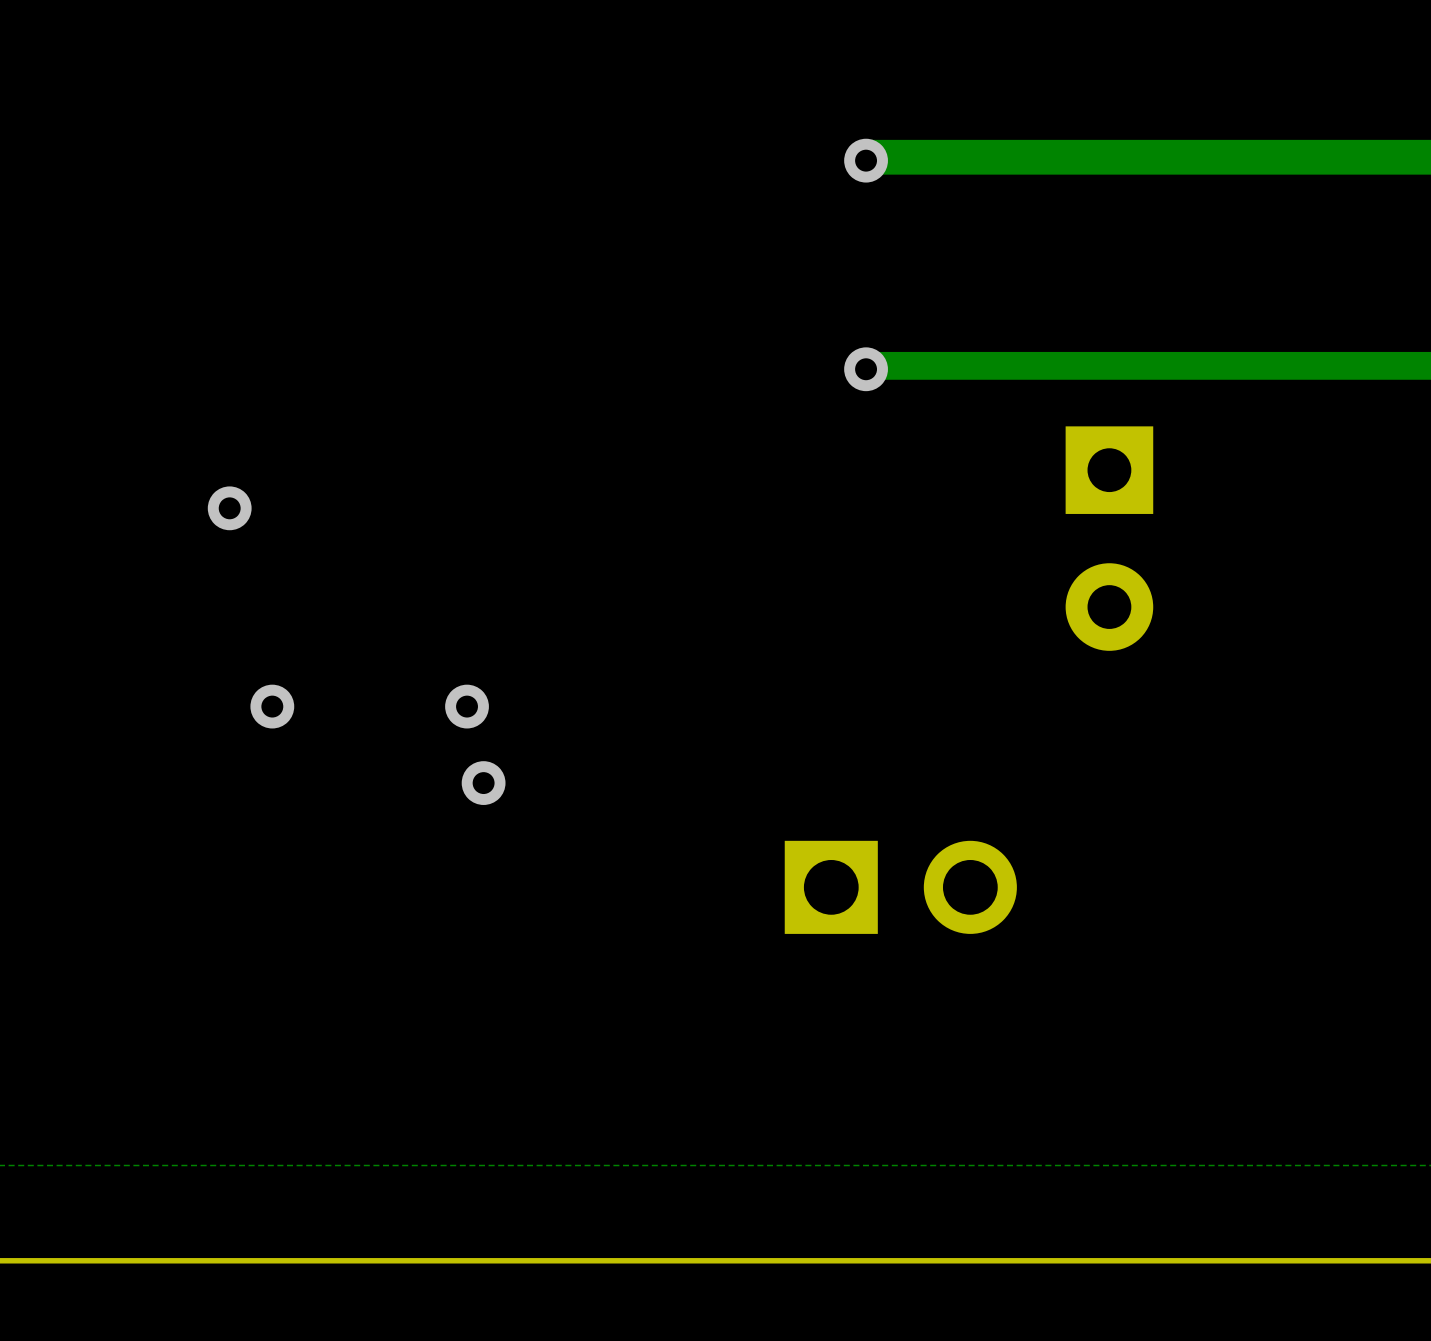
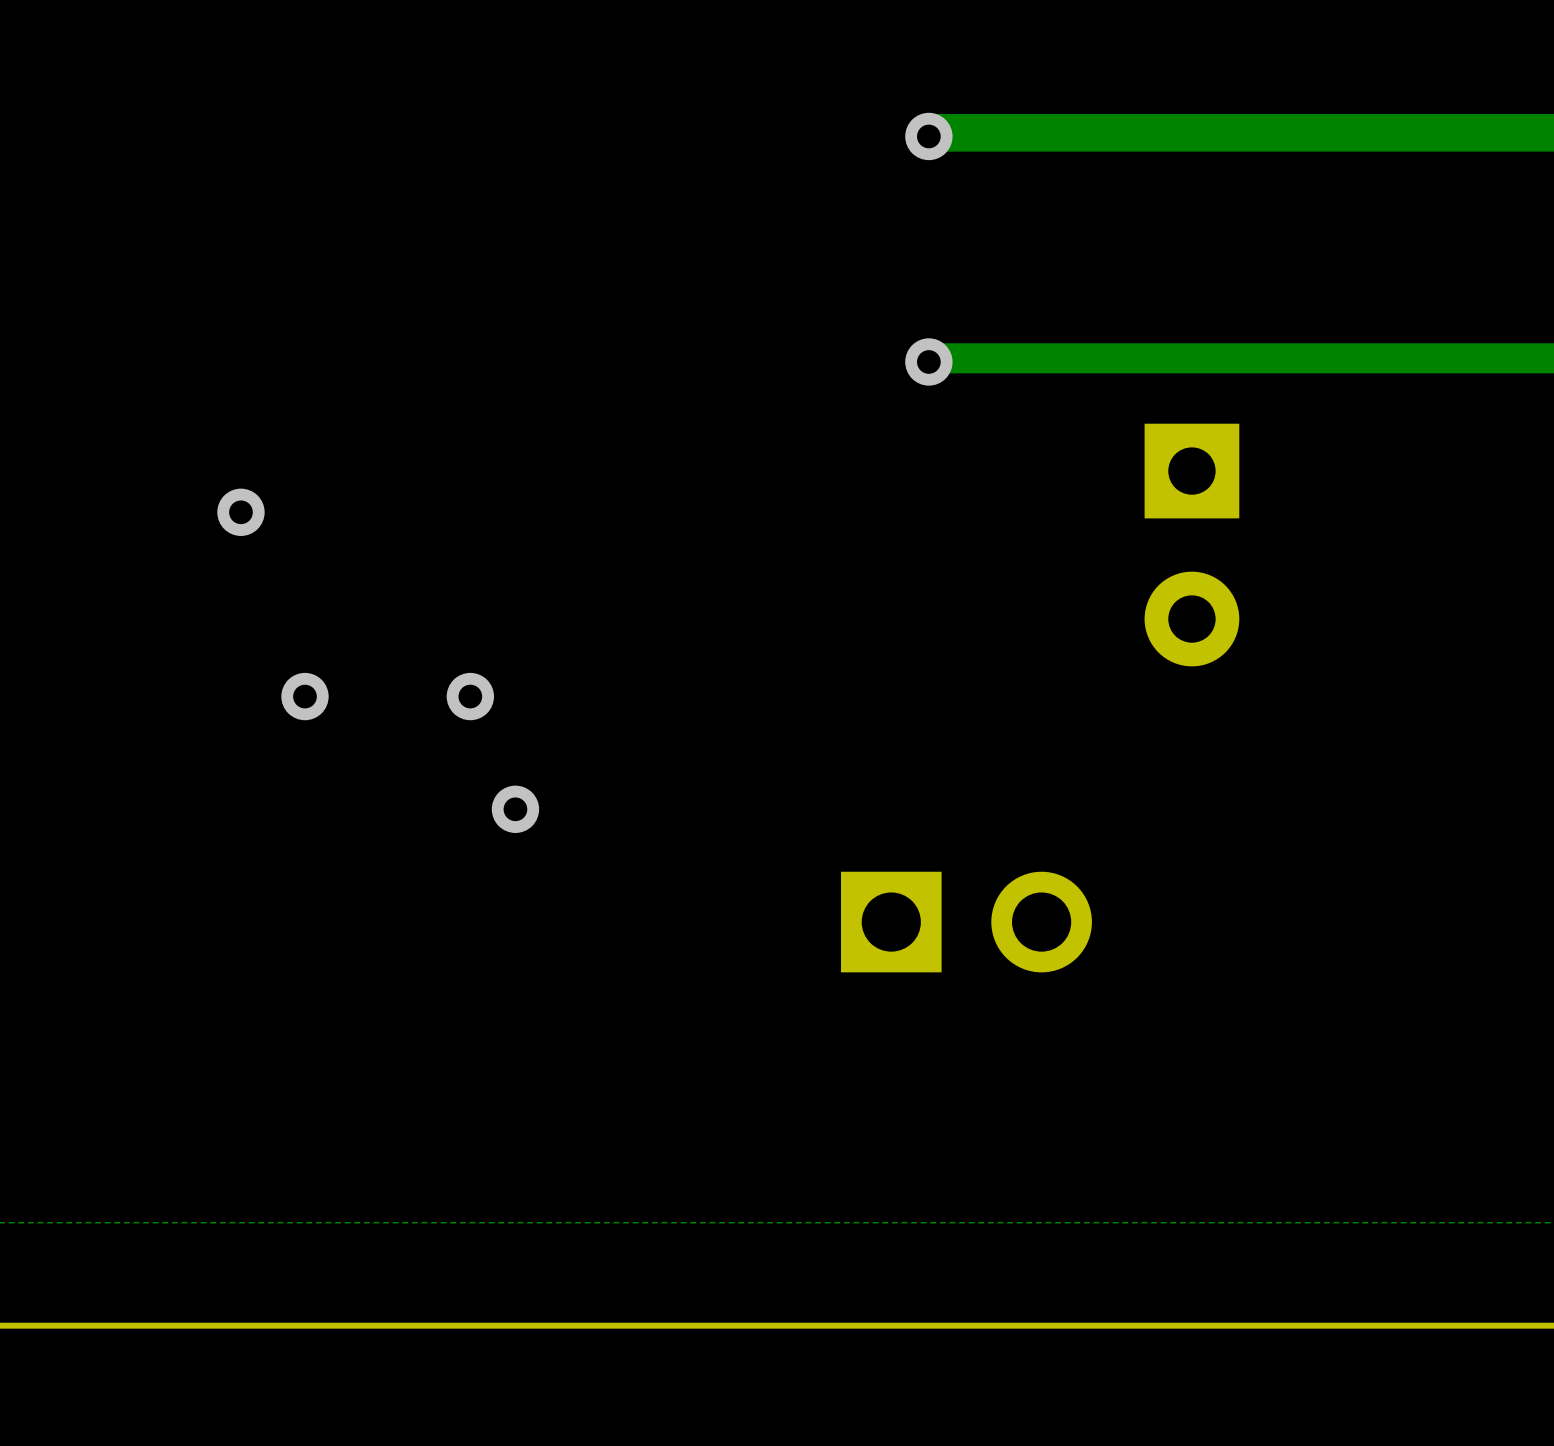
via position: (272, 706) -> (304, 696)
via position: (467, 706) -> (470, 696)

